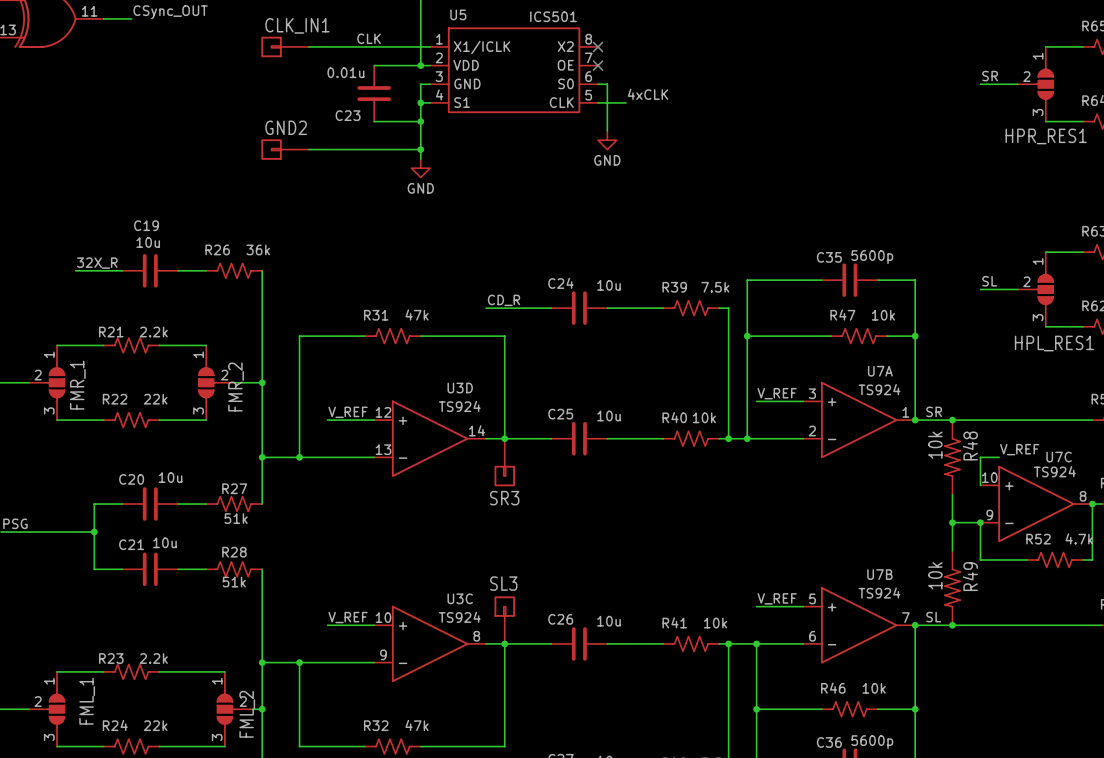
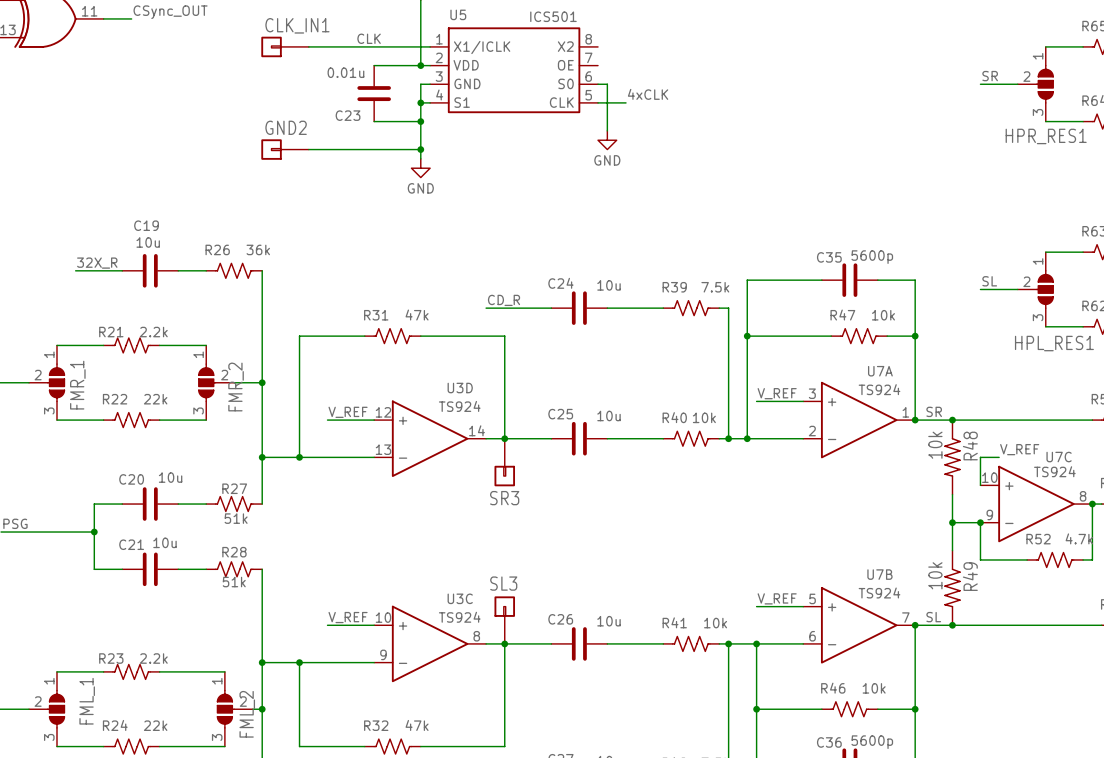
no-connect mark: (598, 46) -> none
no-connect mark: (598, 65) -> none

